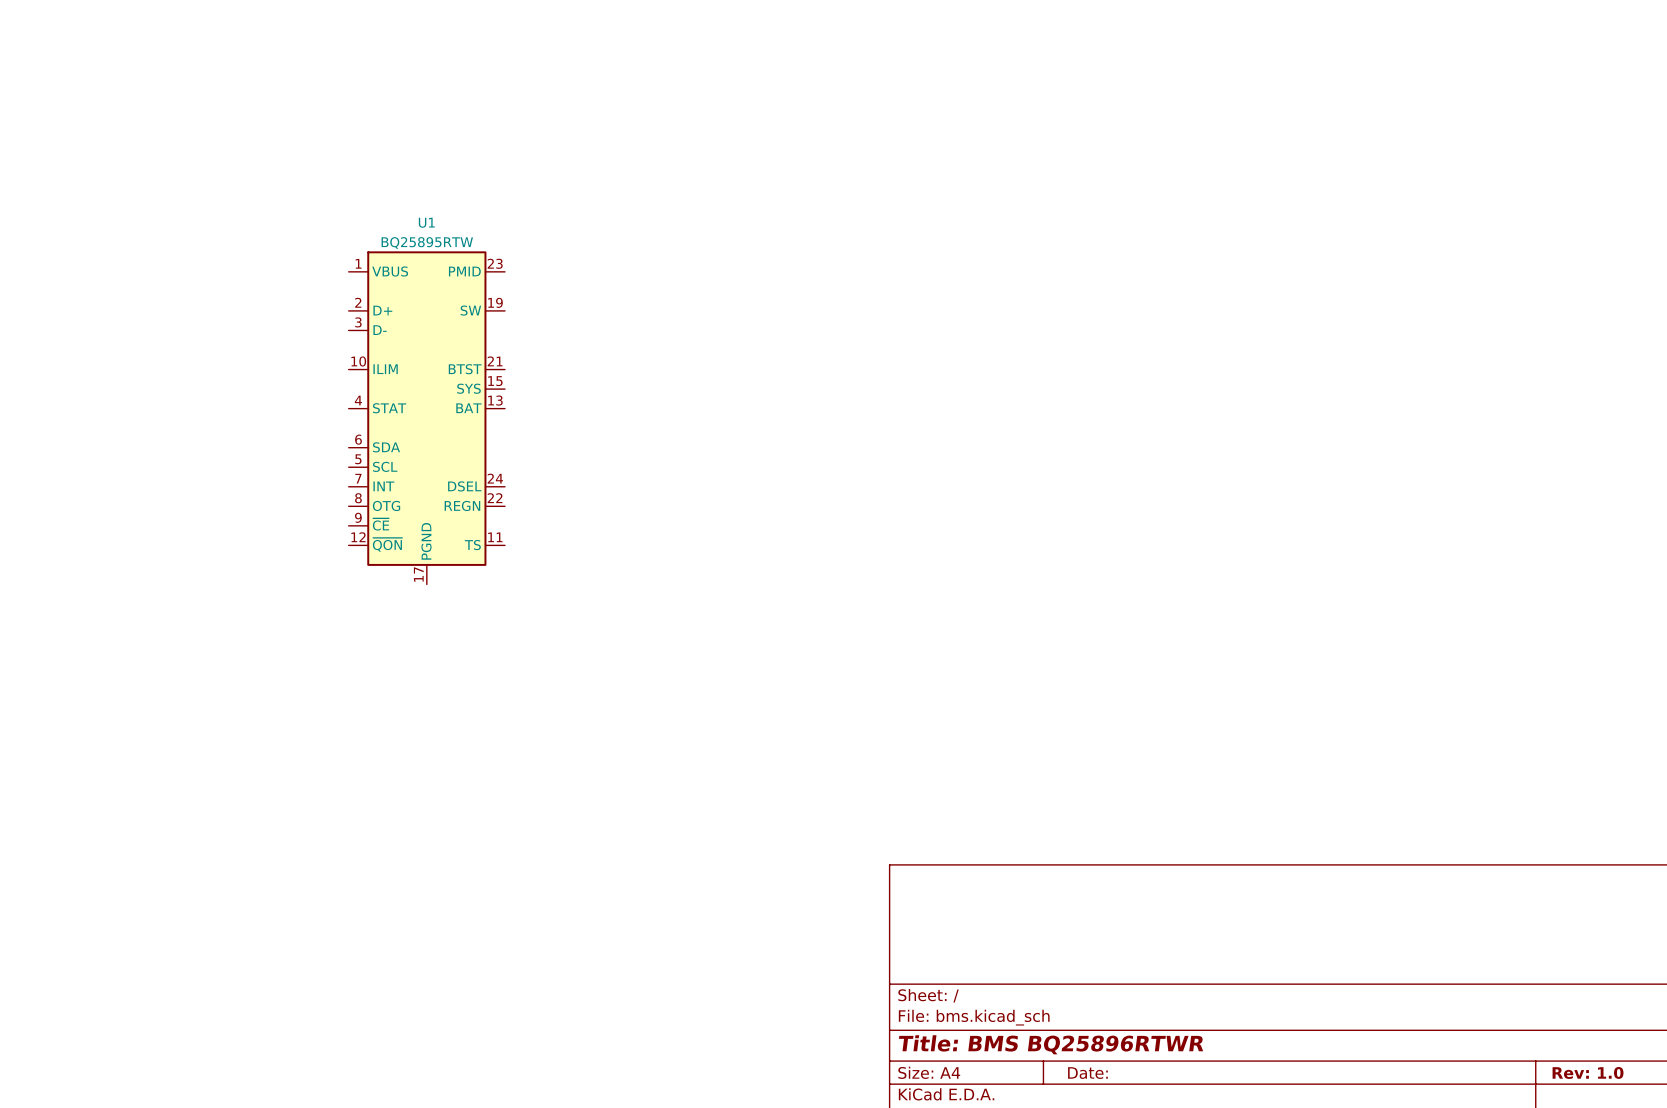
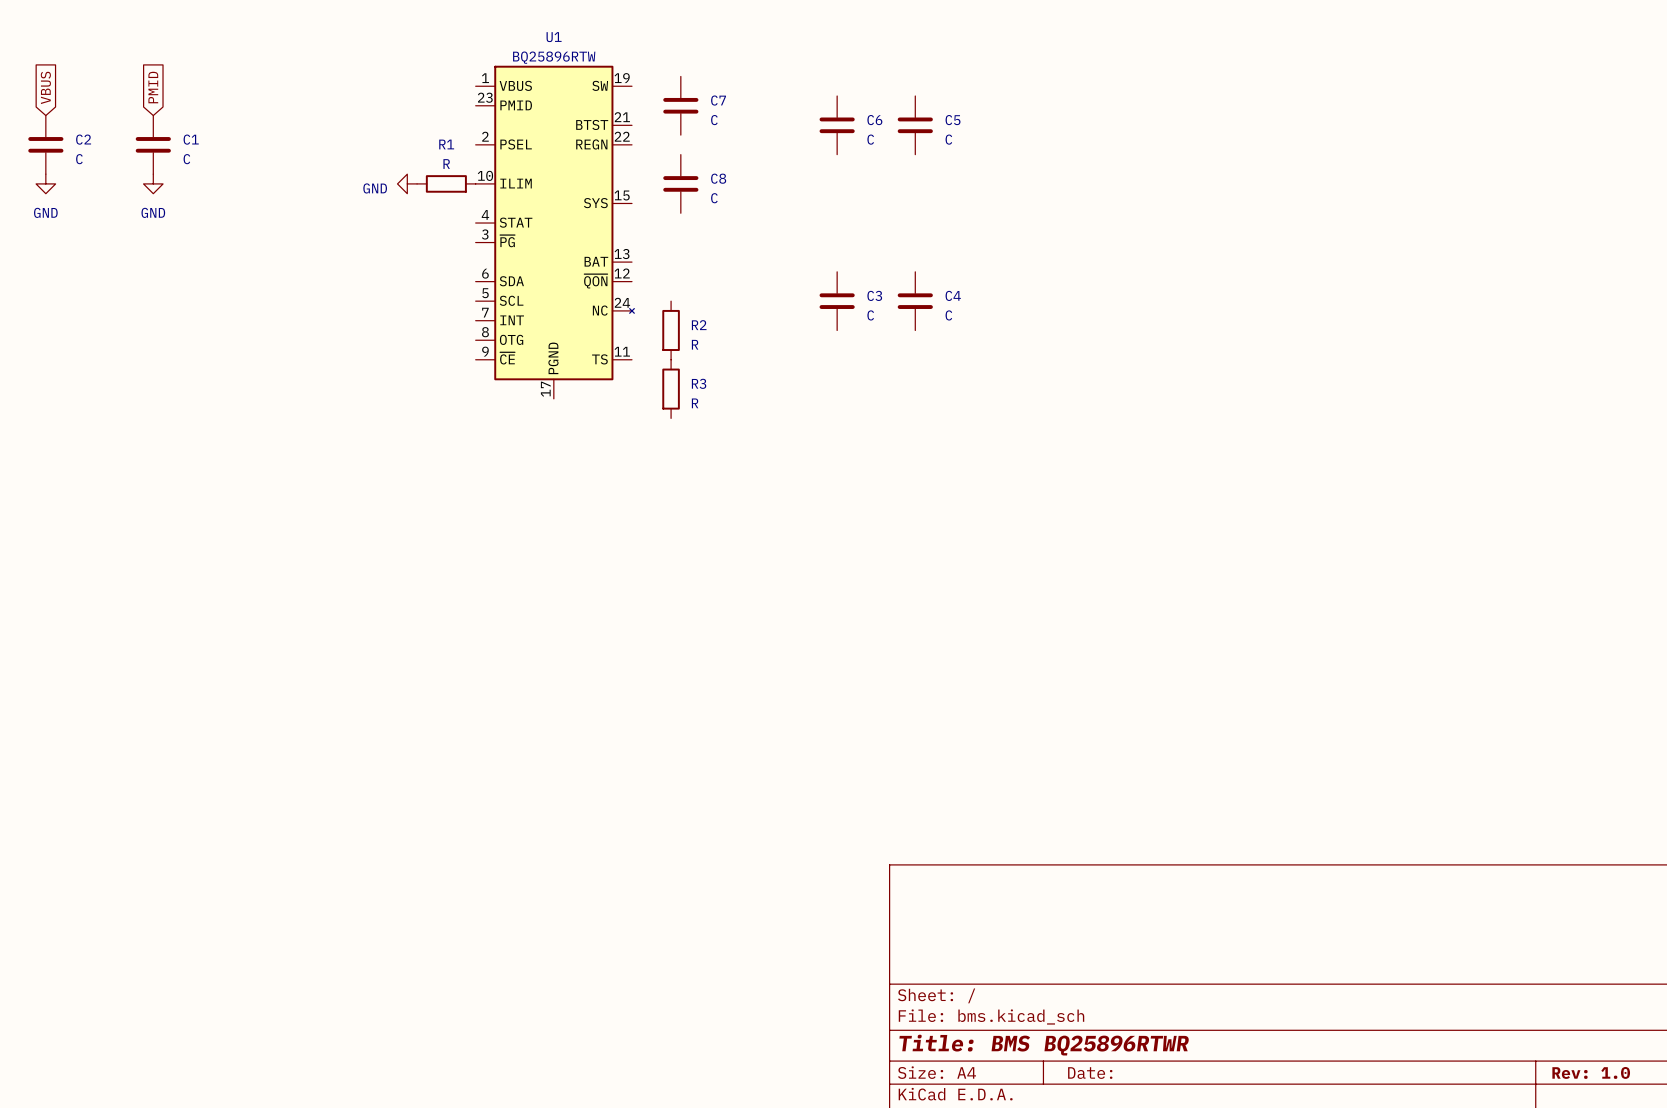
global label: none -> VBUS (45, 87)
global label: none -> PMID (153, 87)
C7: none -> C (680, 105)
C6: none -> C (837, 125)
C5: none -> C (915, 125)
C2: none -> C (45, 144)
C1: none -> C (153, 144)
power symbol: none -> GND (45, 183)
power symbol: none -> GND (153, 183)
power symbol: none -> GND (407, 183)
R1: none -> R (446, 183)
C8: none -> C (680, 183)
U1 value: BQ25895RTW (427, 242) -> BQ25896RTW (554, 57)
U1 symbol: [348, 251, 505, 585] -> [475, 65, 635, 399]
C3: none -> C (837, 301)
C4: none -> C (915, 301)
R2: none -> R (671, 330)
R3: none -> R (671, 389)

